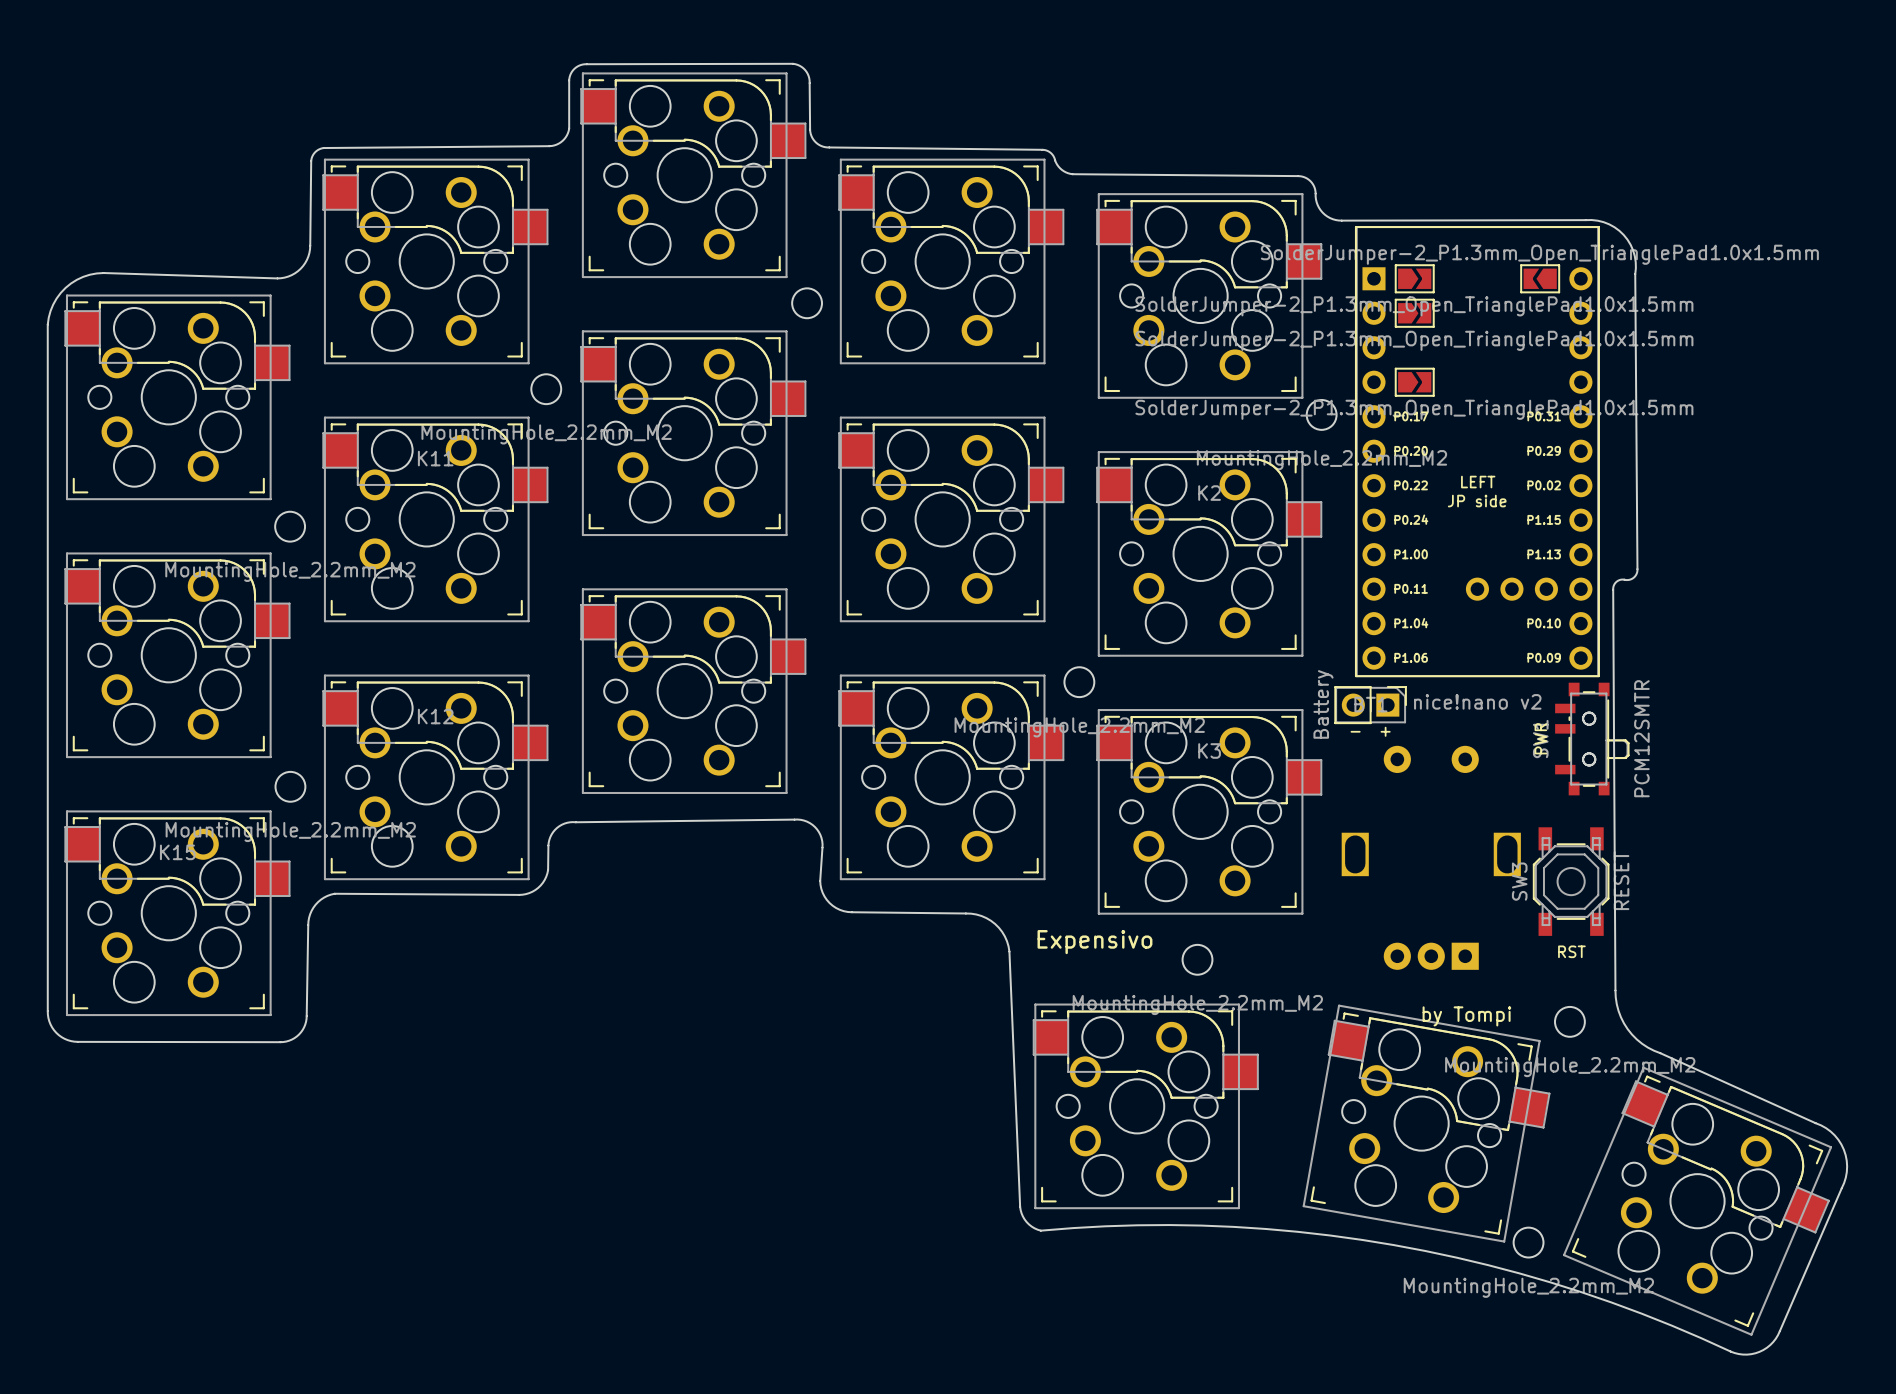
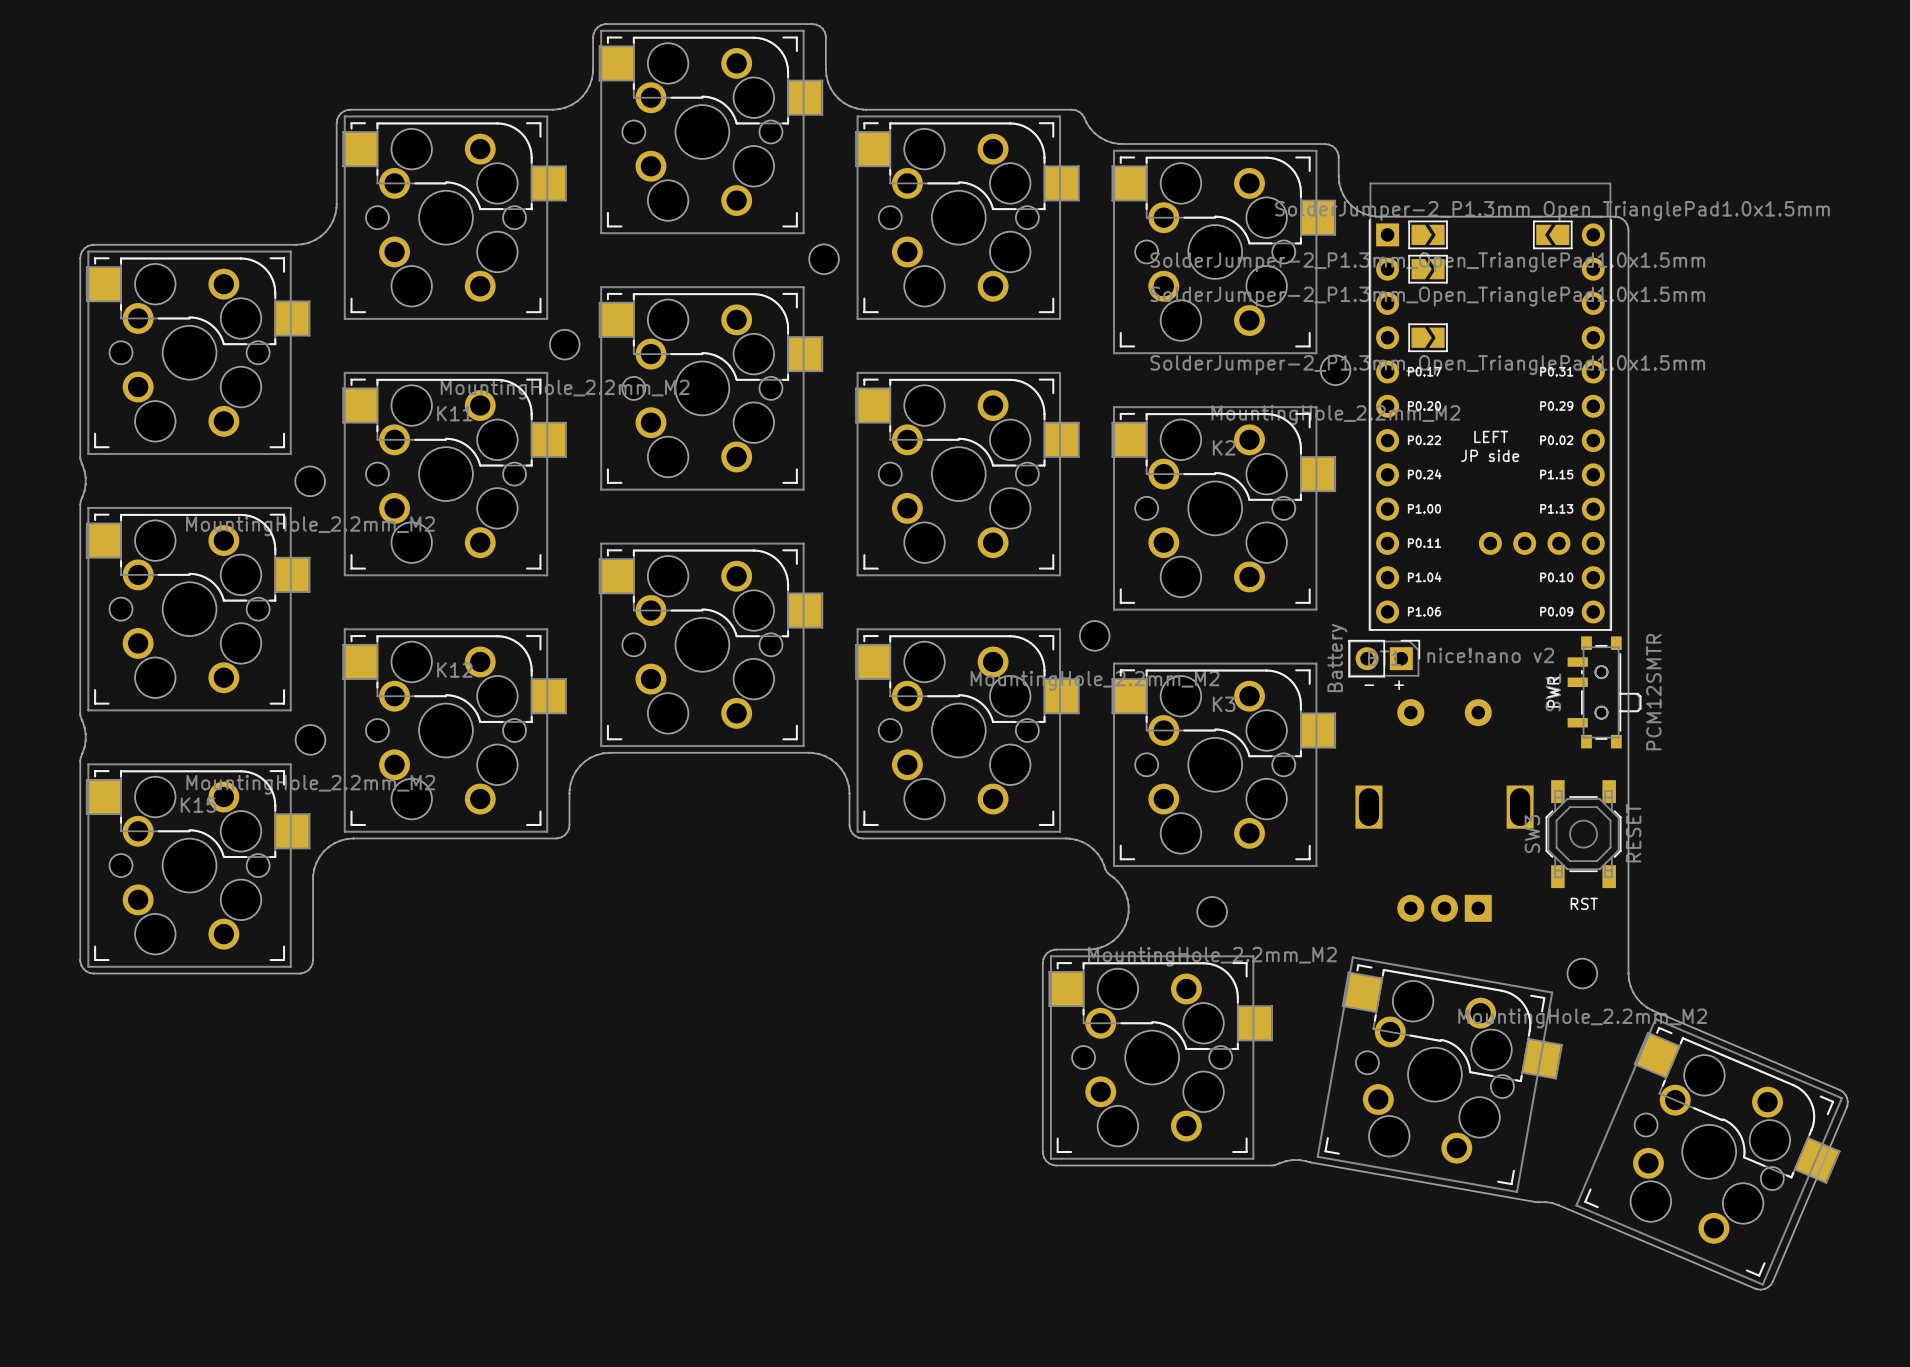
board edge: (793, 63) (581, 64) (573, 70) (569, 78) (568, 131) (562, 140) (554, 145) (323, 148) (316, 151) (311, 160) (309, 252) (303, 266) (291, 275) (277, 278) (96, 273) (76, 279) (60, 292) (50, 310) (47, 324) (47, 1011) (49, 1021) (54, 1030) (64, 1038) (77, 1041) (286, 1041) (299, 1034) (306, 1021) (308, 921) (315, 904) (327, 895) (334, 893) (526, 894) (538, 887) (546, 876) (548, 842) (551, 834) (559, 826) (570, 822) (800, 819) (812, 824) (820, 835) (822, 844) (821, 888) (826, 899) (836, 908) (851, 912) (976, 914) (990, 920) (1004, 936) (1009, 951) (1020, 1206) (1024, 1219) (1034, 1228) (1040, 1230) (1137, 1225) (1233, 1226) (1298, 1231) (1393, 1245) (1488, 1265) (1581, 1292) (1641, 1313) (1734, 1353) (1751, 1354) (1766, 1347) (1778, 1335) (1844, 1183) (1847, 1166) (1843, 1149) (1834, 1135) (1820, 1125) (1642, 1043) (1624, 1023) (1615, 997) (1613, 588) (1618, 580) (1633, 577) (1637, 570) (1635, 262) (1633, 250) (1627, 239) (1614, 227) (1603, 222) (1591, 220) (1335, 220) (1327, 216) (1320, 210) (1316, 202) (1312, 184) (1307, 178) (1300, 176) (1072, 174) (1061, 169) (1051, 153) (1043, 149) (825, 147) (816, 142) (810, 133) (808, 76) (803, 68) (793, 63) -> none
board edge: none -> (1084, 117) (1079, 111) (1072, 109) (866, 109) (850, 106) (838, 98) (828, 82) (825, 69) (825, 35) (822, 28) (816, 24) (604, 24) (597, 27) (593, 33) (592, 72) (589, 85) (577, 100) (565, 107) (552, 109) (350, 109) (341, 113) (336, 123) (335, 213) (326, 231) (309, 242) (295, 244) (93, 244) (84, 248) (80, 258) (80, 457) (85, 478) (80, 504) (80, 713) (85, 734) (80, 760) (81, 965) (86, 971) (93, 973) (301, 973) (308, 970) (313, 960) (314, 868) (324, 851) (339, 840) (353, 838) (561, 837) (568, 828) (569, 790) (573, 776) (585, 761) (602, 753) (818, 753) (835, 763) (844, 774) (848, 787) (849, 826) (852, 833) (859, 837) (1075, 839) (1093, 849) (1101, 859) (1107, 872) (1122, 887) (1127, 899) (1128, 912) (1125, 925) (1113, 940) (1094, 949) (1054, 949) (1047, 952) (1043, 959) (1042, 1152) (1044, 1157) (1049, 1163) (1056, 1165) (1272, 1165) (1286, 1160) (1299, 1160) (1535, 1202) (1551, 1203) (1755, 1288) (1764, 1289) (1772, 1281) (1846, 1107) (1847, 1098) (1839, 1089) (1653, 1010)
board edge: none -> (1084, 117) (1090, 128) (1099, 137) (1118, 143) (1329, 144) (1335, 148) (1338, 155) (1339, 182) (1343, 195) (1356, 209) (1369, 215) (1614, 216) (1622, 218) (1627, 224) (1628, 973) (1630, 986) (1636, 997) (1652, 1010)
part footprint: [1355, 226, 1600, 677] -> [1368, 182, 1613, 631]
text: Expensivo (1094, 942) -> none
text: by Tompi (1466, 1016) -> none
part: MountingHole_2.2mm_M2 (1528, 1242) -> none

